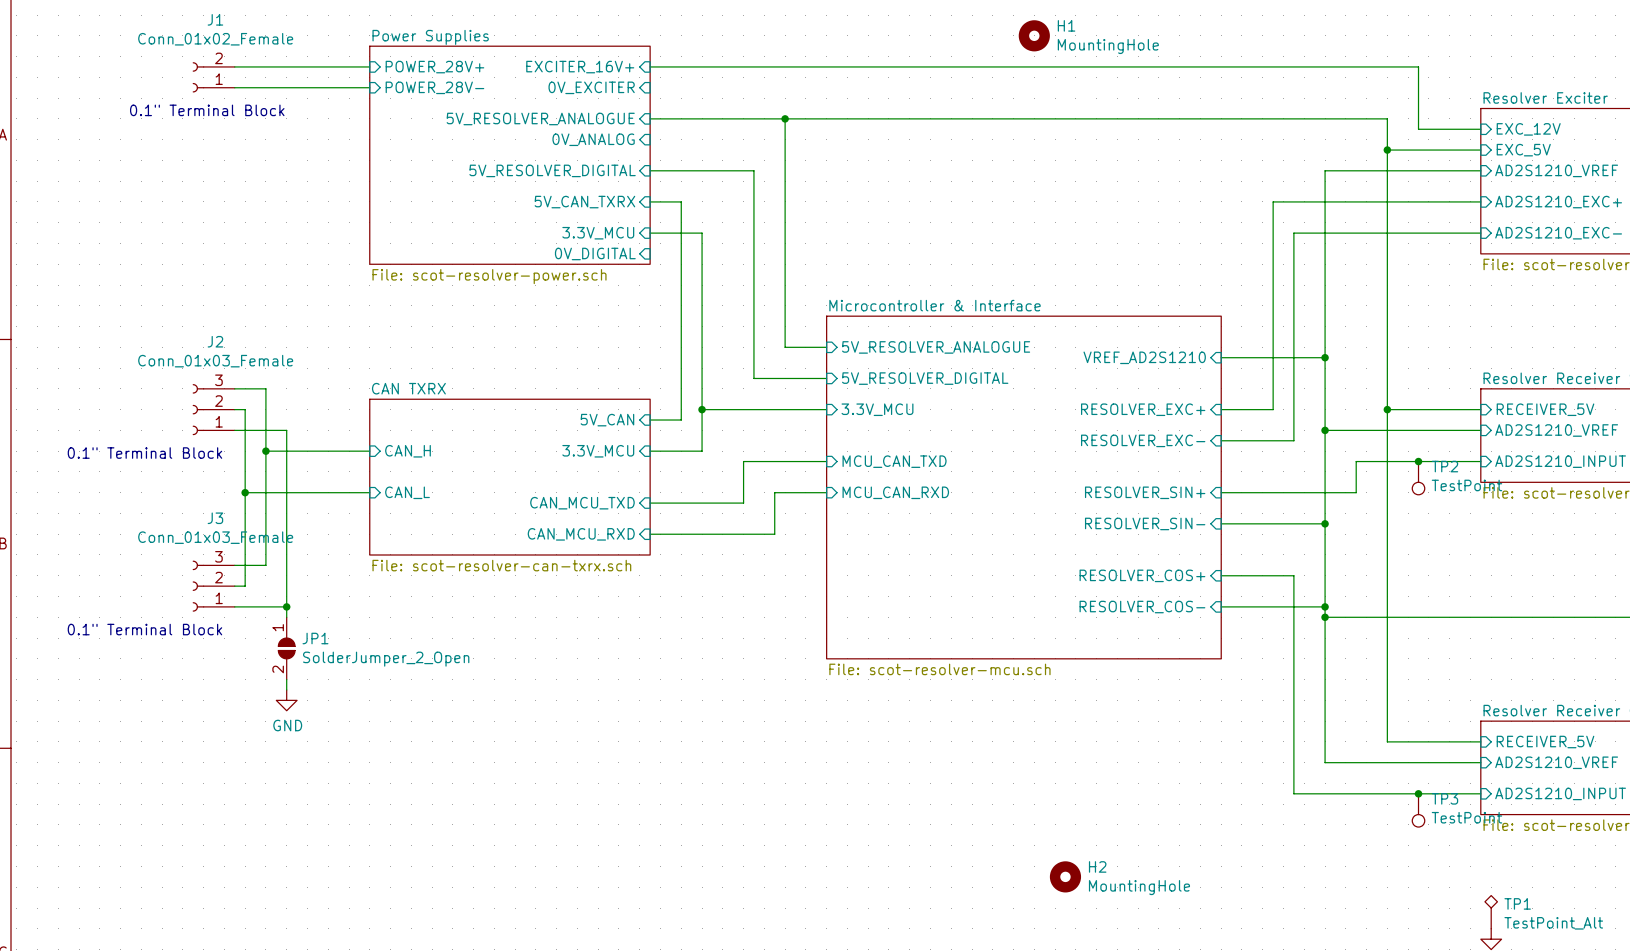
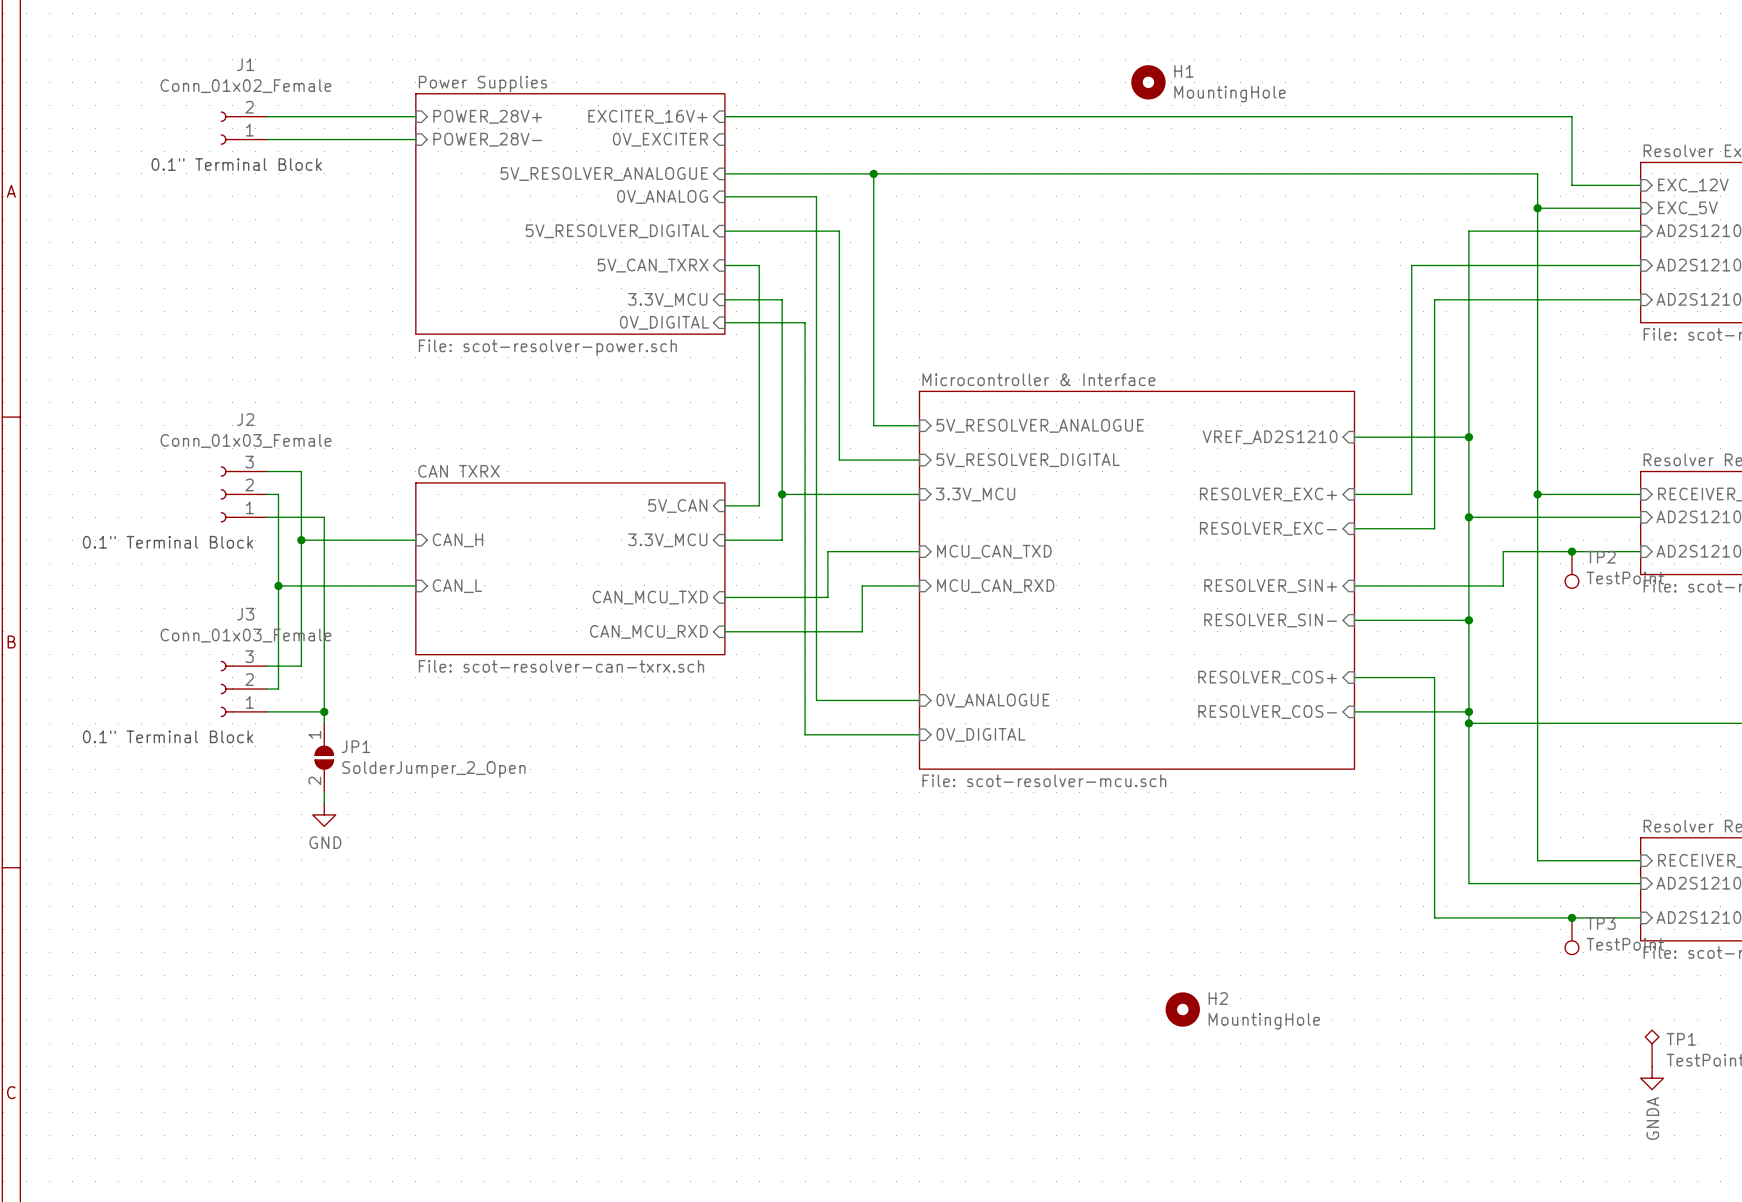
wire: none -> (724, 196) (816, 196) (816, 700) (919, 700)
wire: none -> (724, 322) (805, 322) (805, 734) (919, 734)
sheet pin: none -> 0V_ANALOGUE (992, 700)
sheet pin: none -> 0V_DIGITAL (981, 734)

